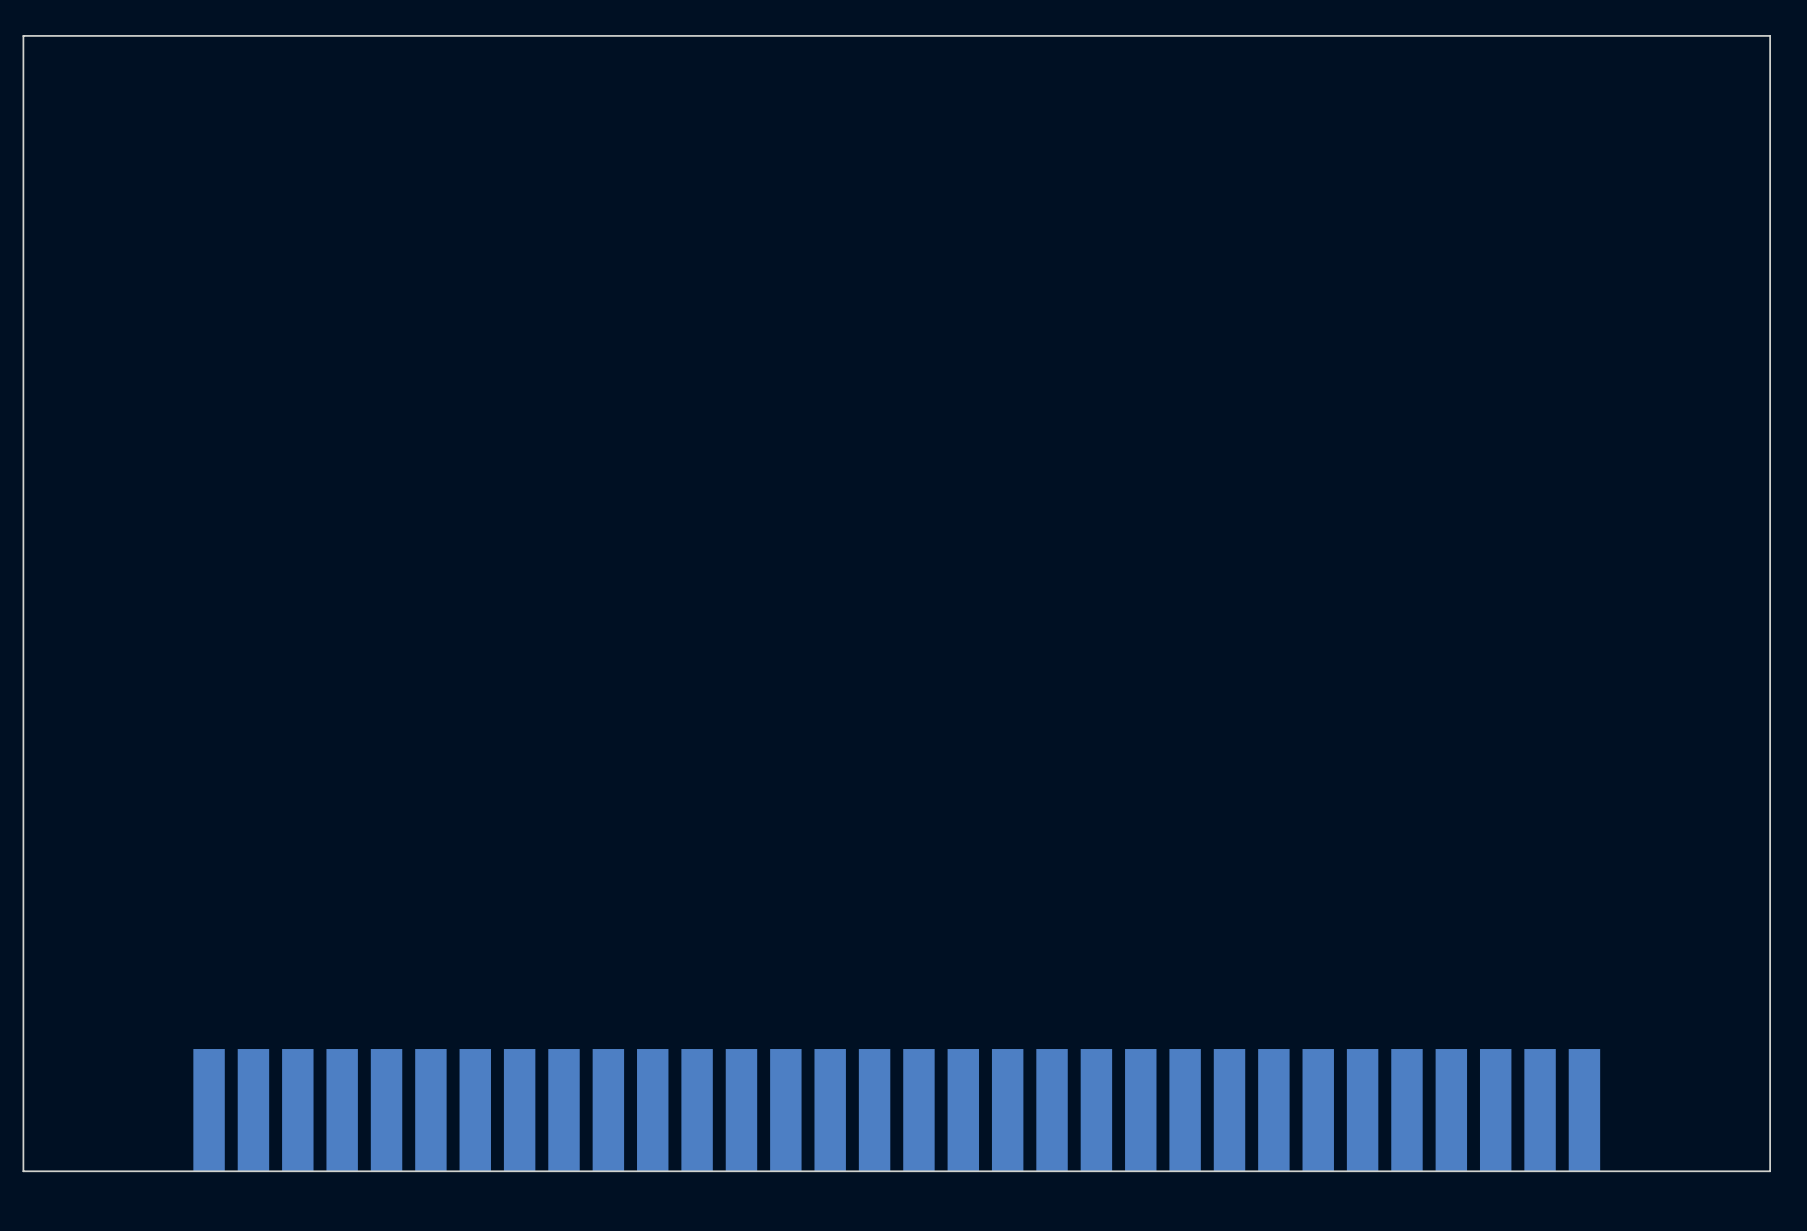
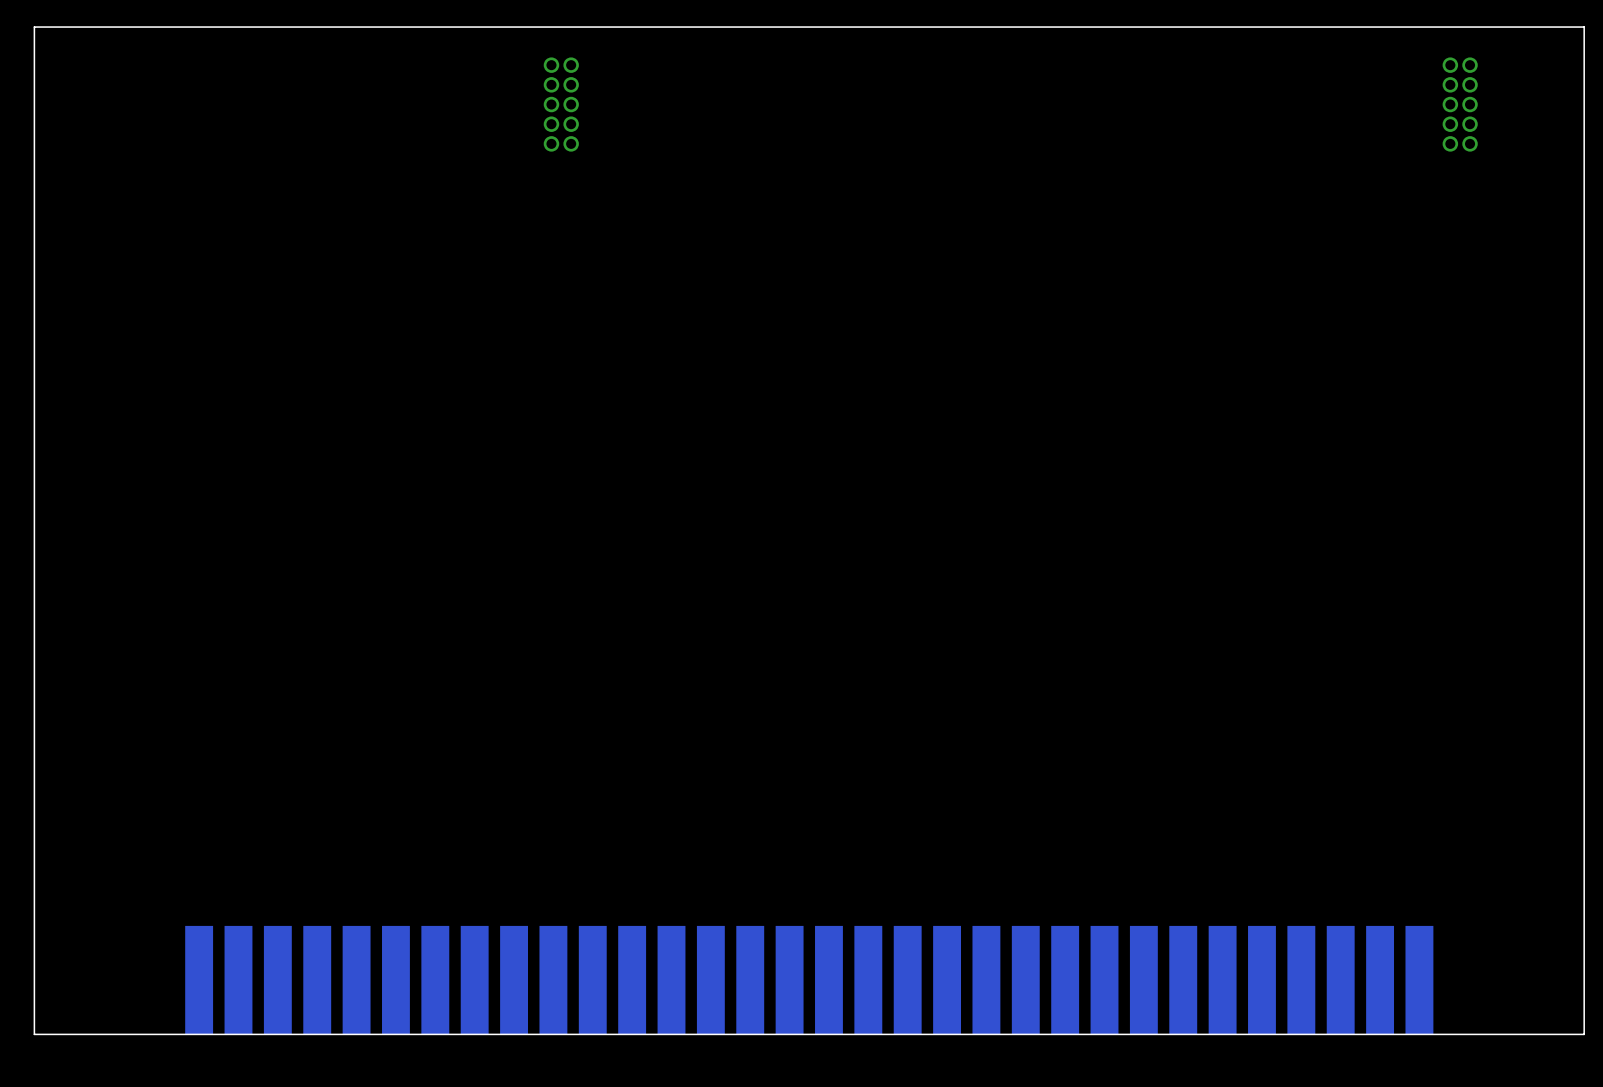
part: none -> (561, 104)
part: none -> (1460, 104)

